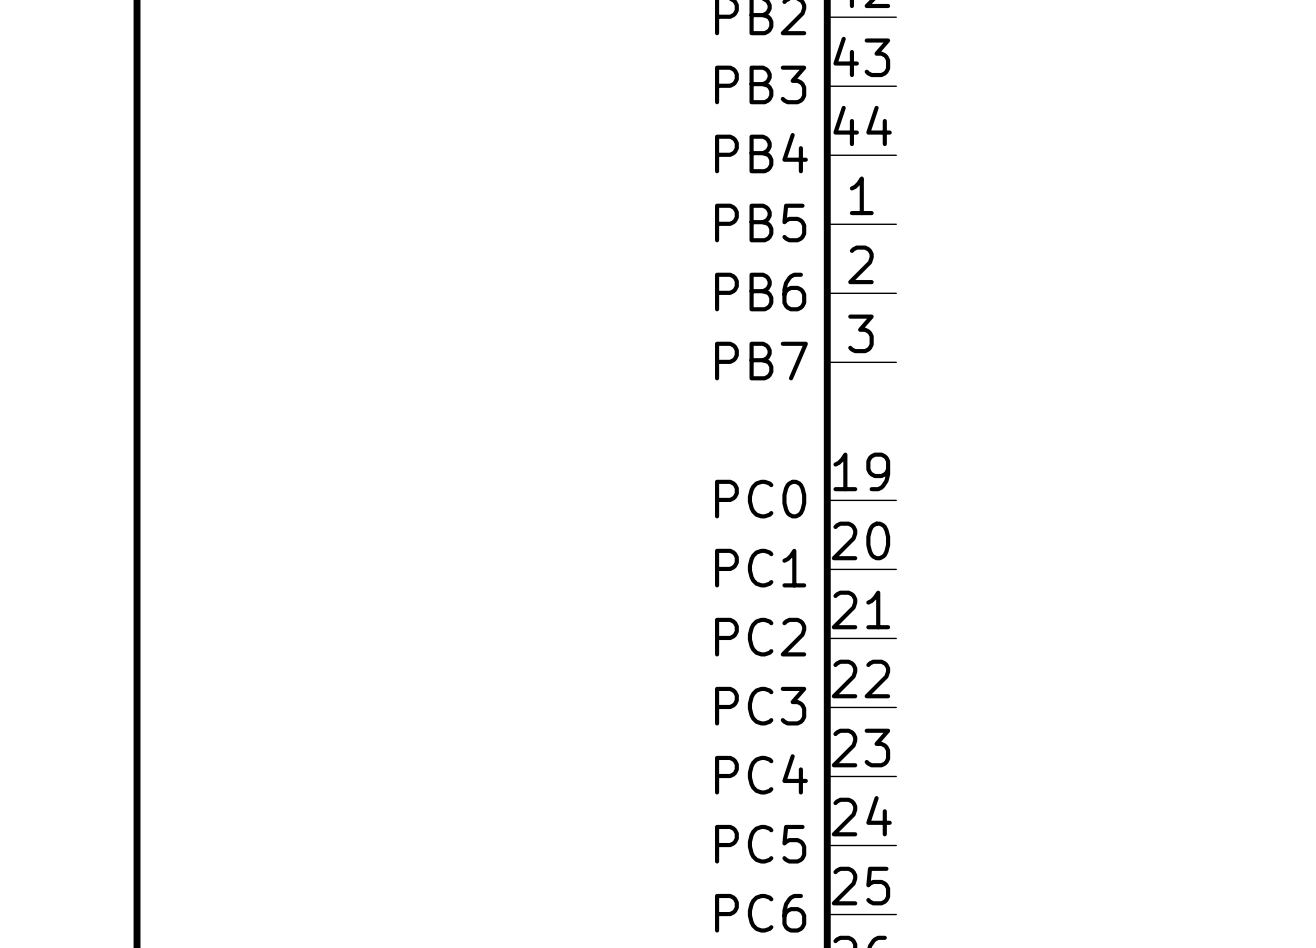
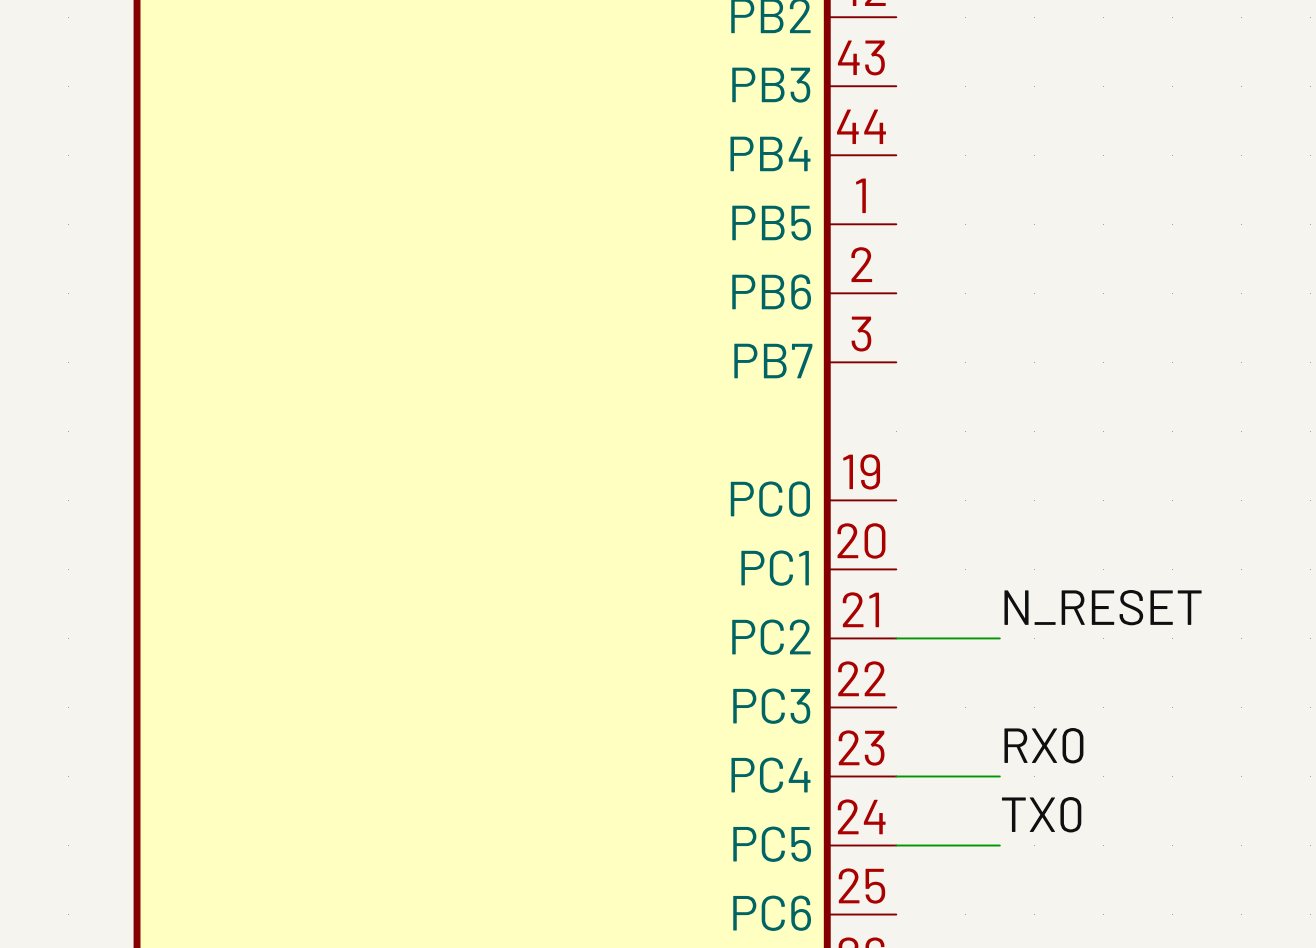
label: none -> N_RESET (1103, 607)
wire: none -> (896, 638) (999, 638)
label: none -> RX0 (1043, 745)
wire: none -> (896, 776) (999, 776)
label: none -> TX0 (1041, 814)
wire: none -> (896, 845) (999, 845)

